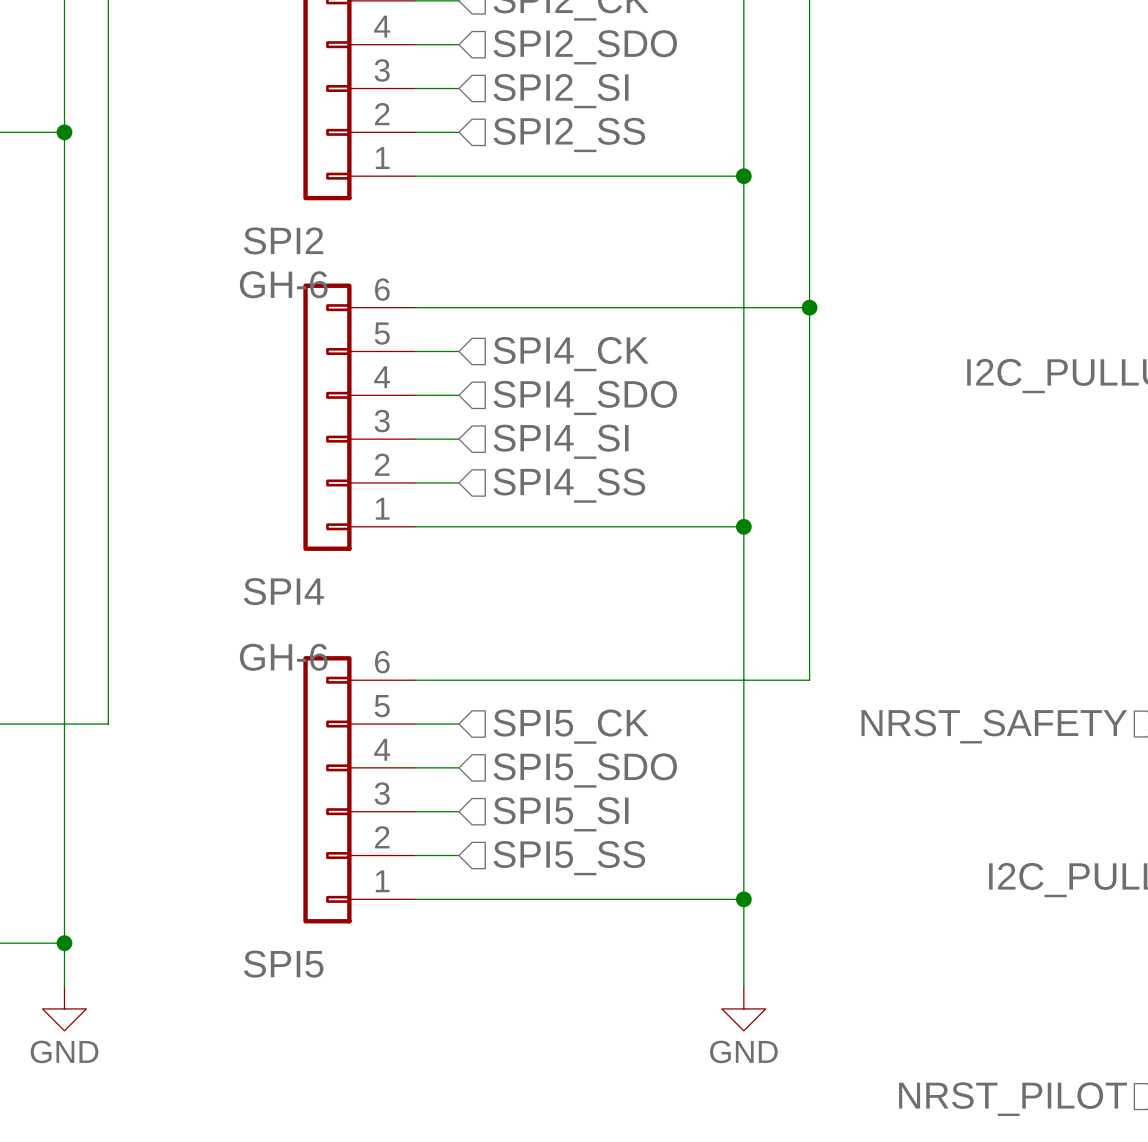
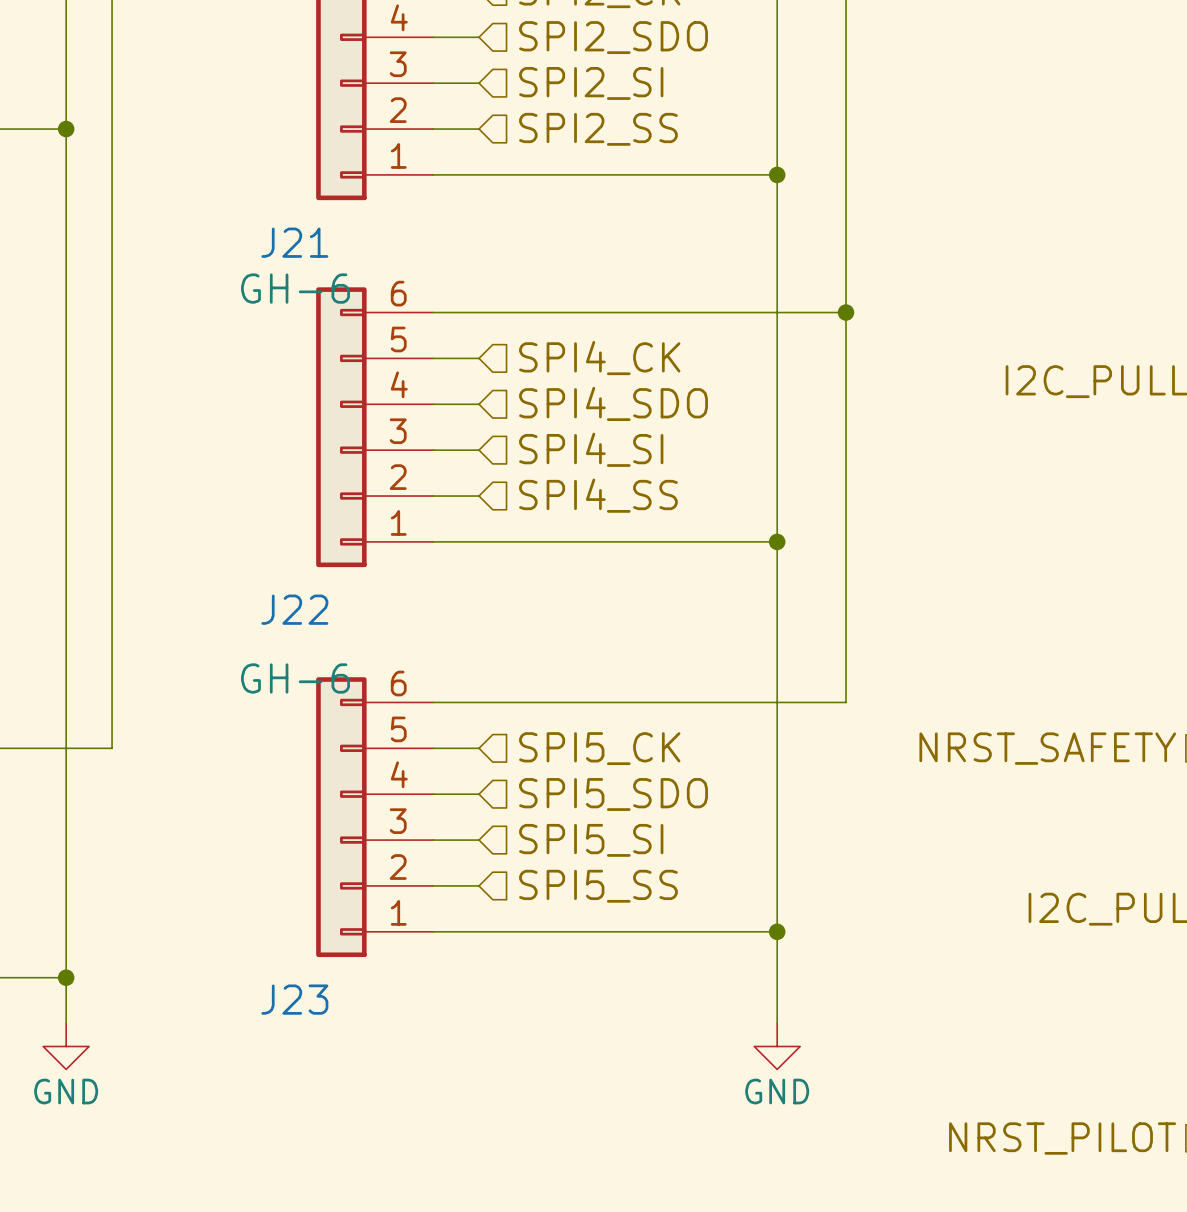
SPI2 name: SPI2 (283, 240) -> J21 (294, 242)
SPI4 name: SPI4 (283, 591) -> J22 (294, 609)
SPI5 name: SPI5 (283, 964) -> J23 (294, 999)

